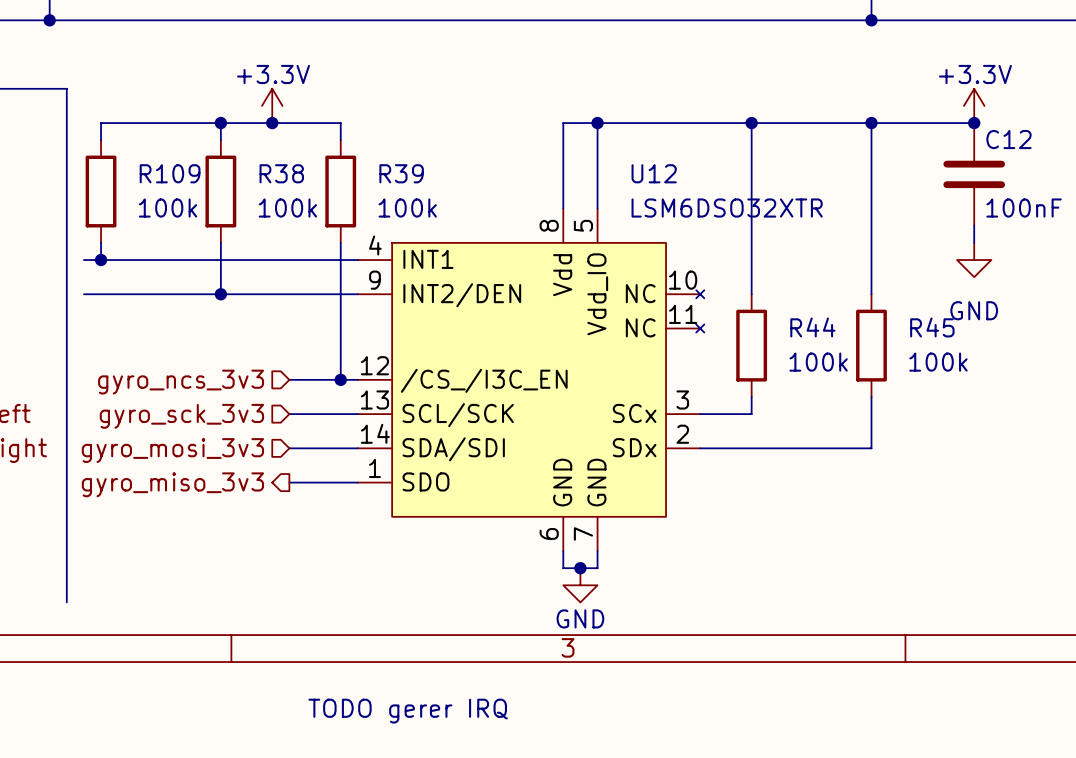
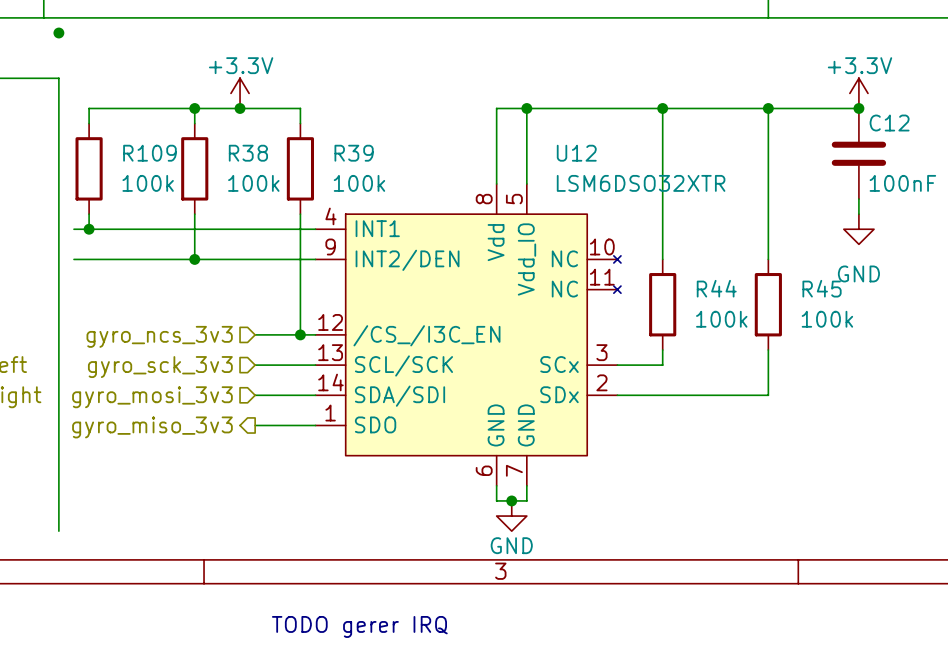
junction position: (49, 20) -> (58, 33)
junction: (871, 20) -> none

